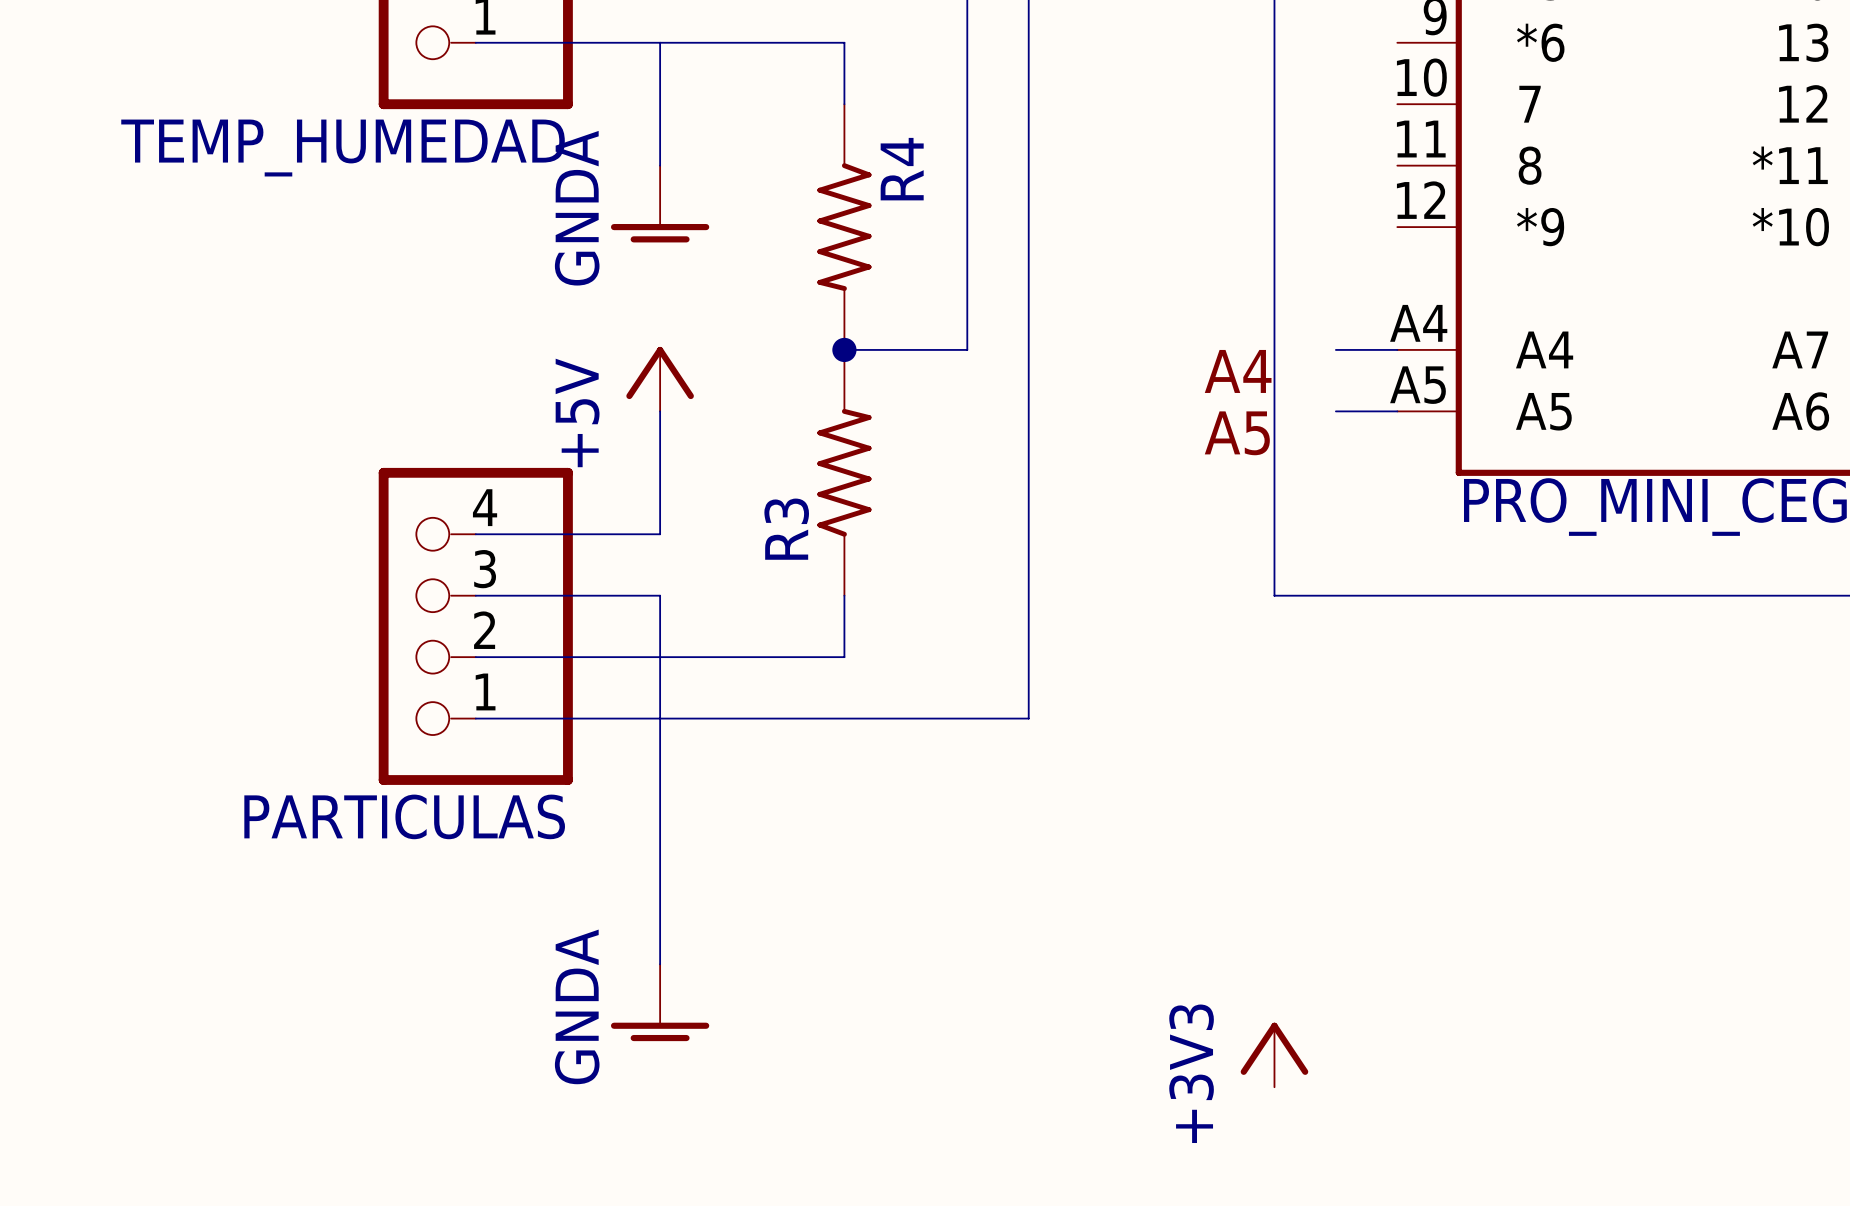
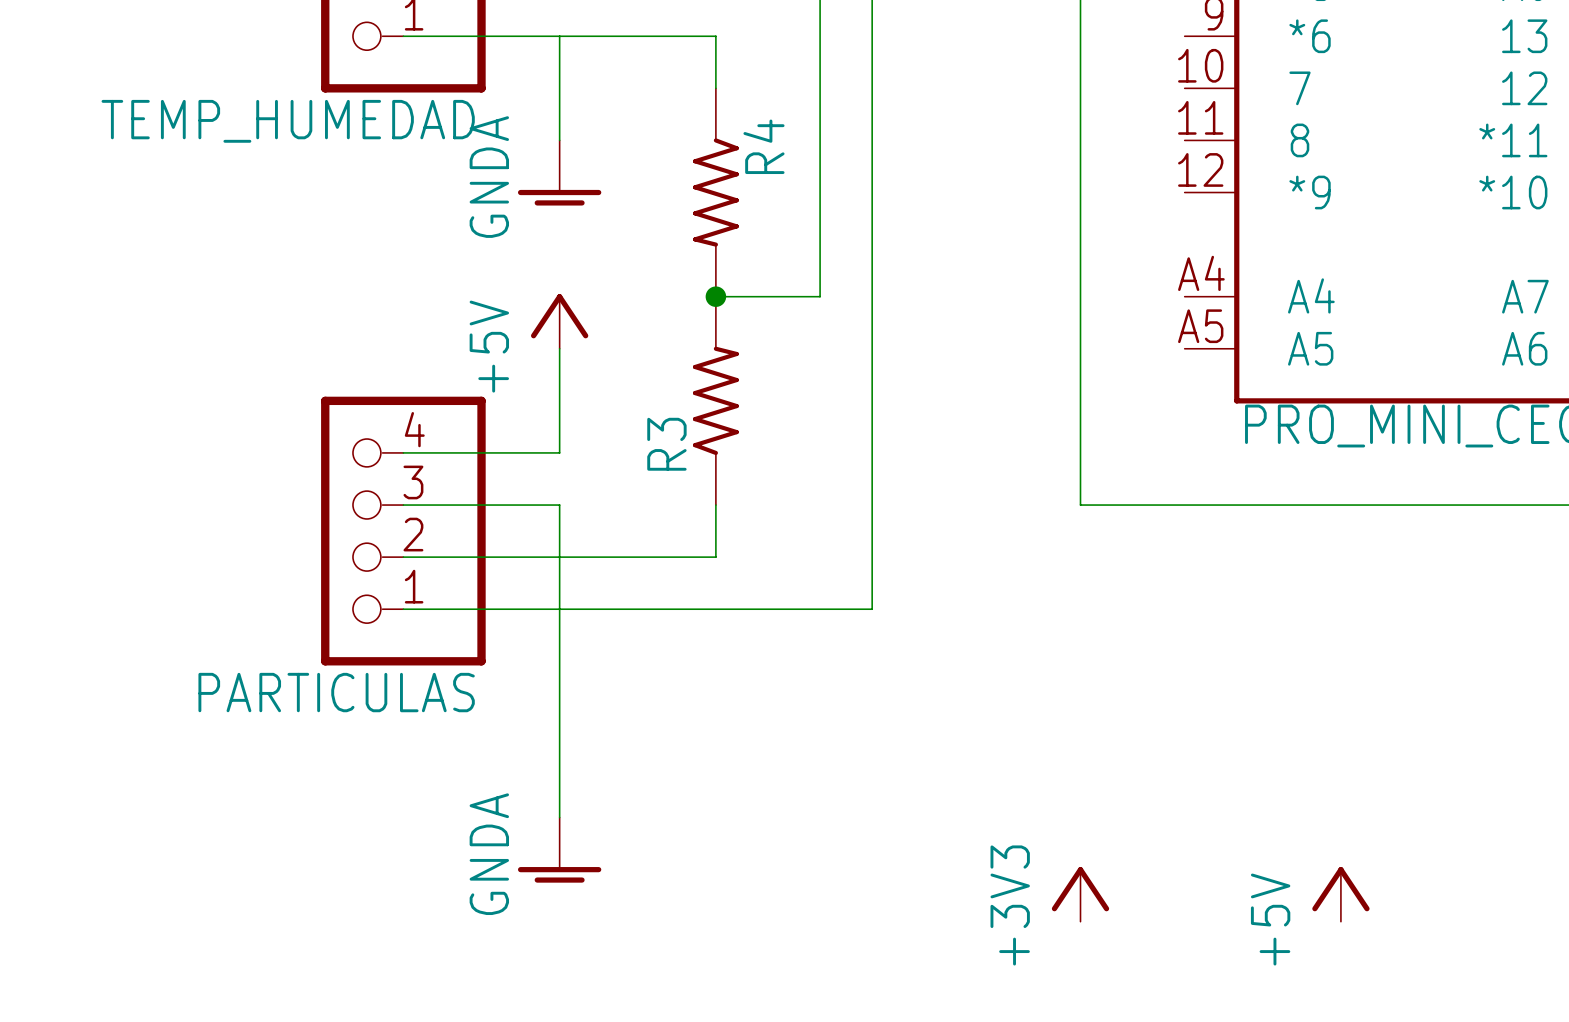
wire: (1335, 349) (1397, 349) -> none
label: A4 (1238, 371) -> none
wire: (1335, 411) (1397, 411) -> none
label: A5 (1237, 433) -> none
power symbol: none -> +5V (1340, 894)

